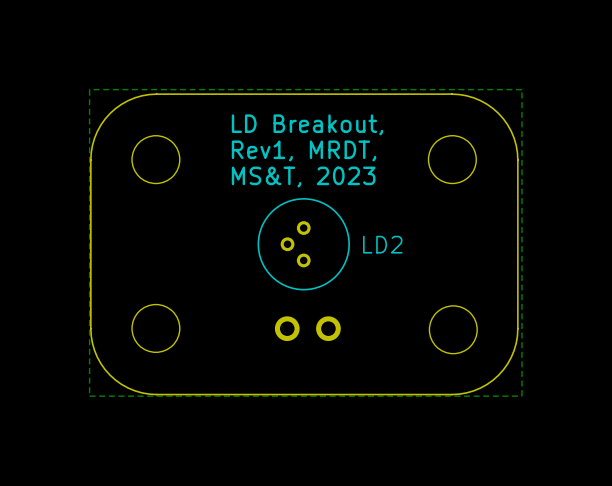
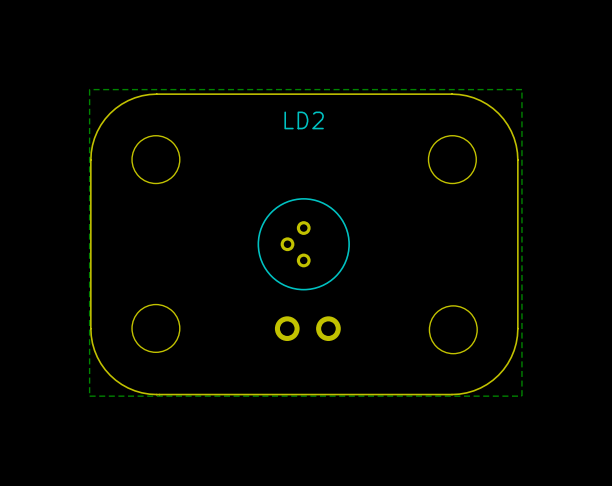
text: LD Breakout, (307, 124) -> none
text: Rev1, MRDT, (304, 150) -> none
text: MS&T, 2023 (303, 177) -> none
LD2 name position: LD2 (382, 244) -> LD2 (304, 120)

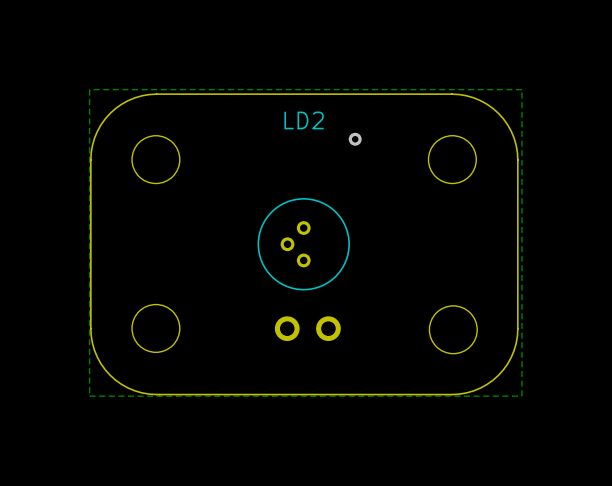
via: none -> (355, 139)

